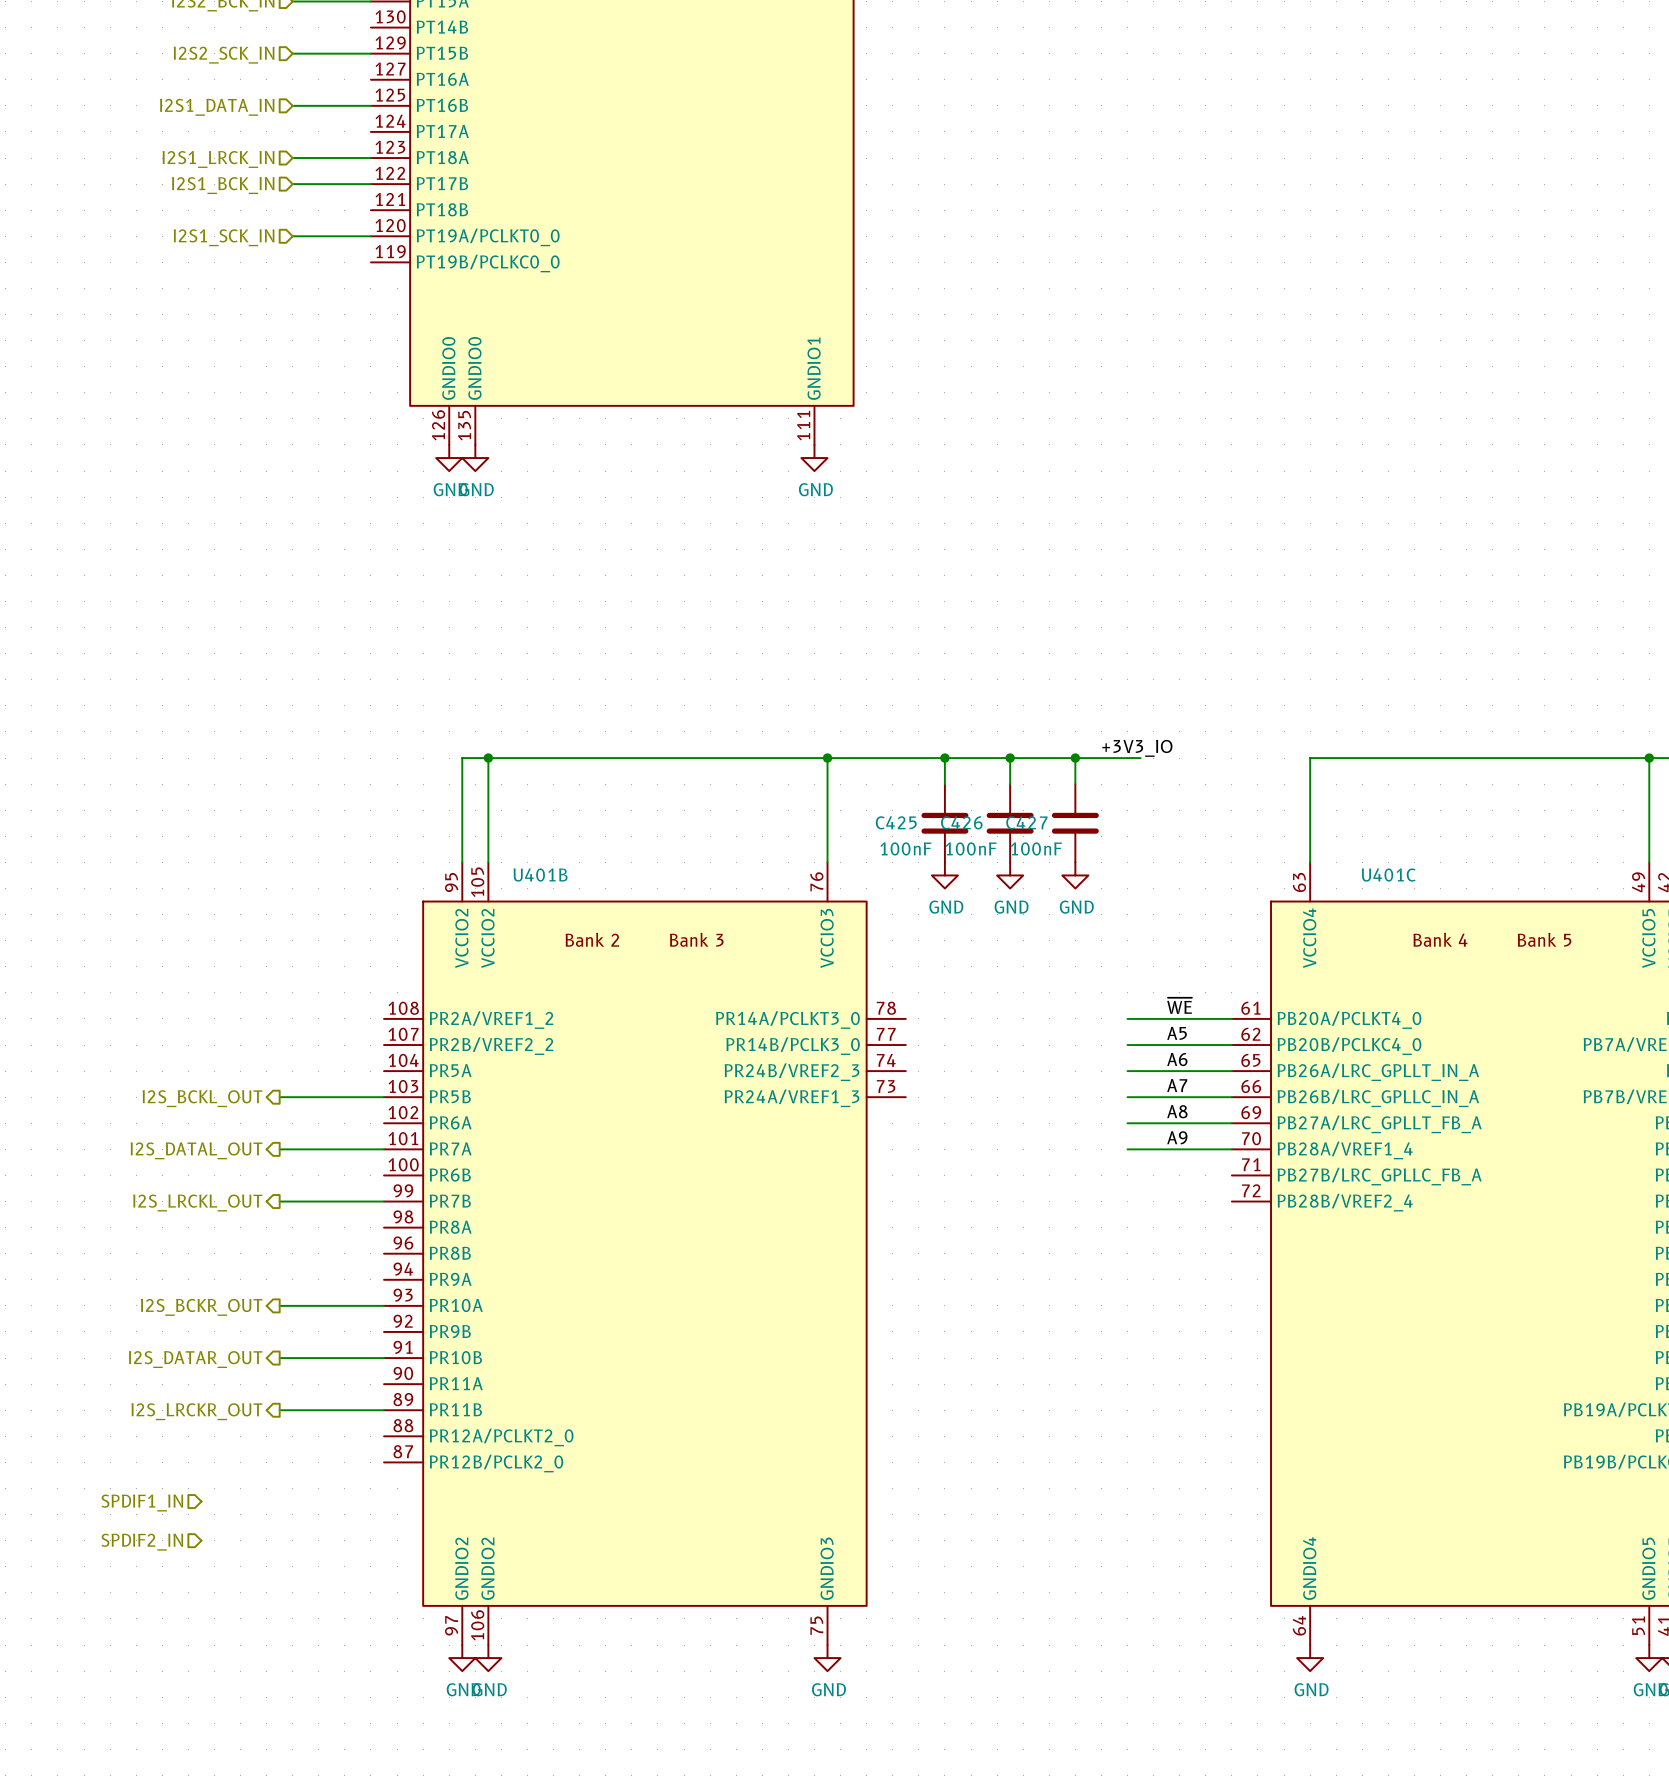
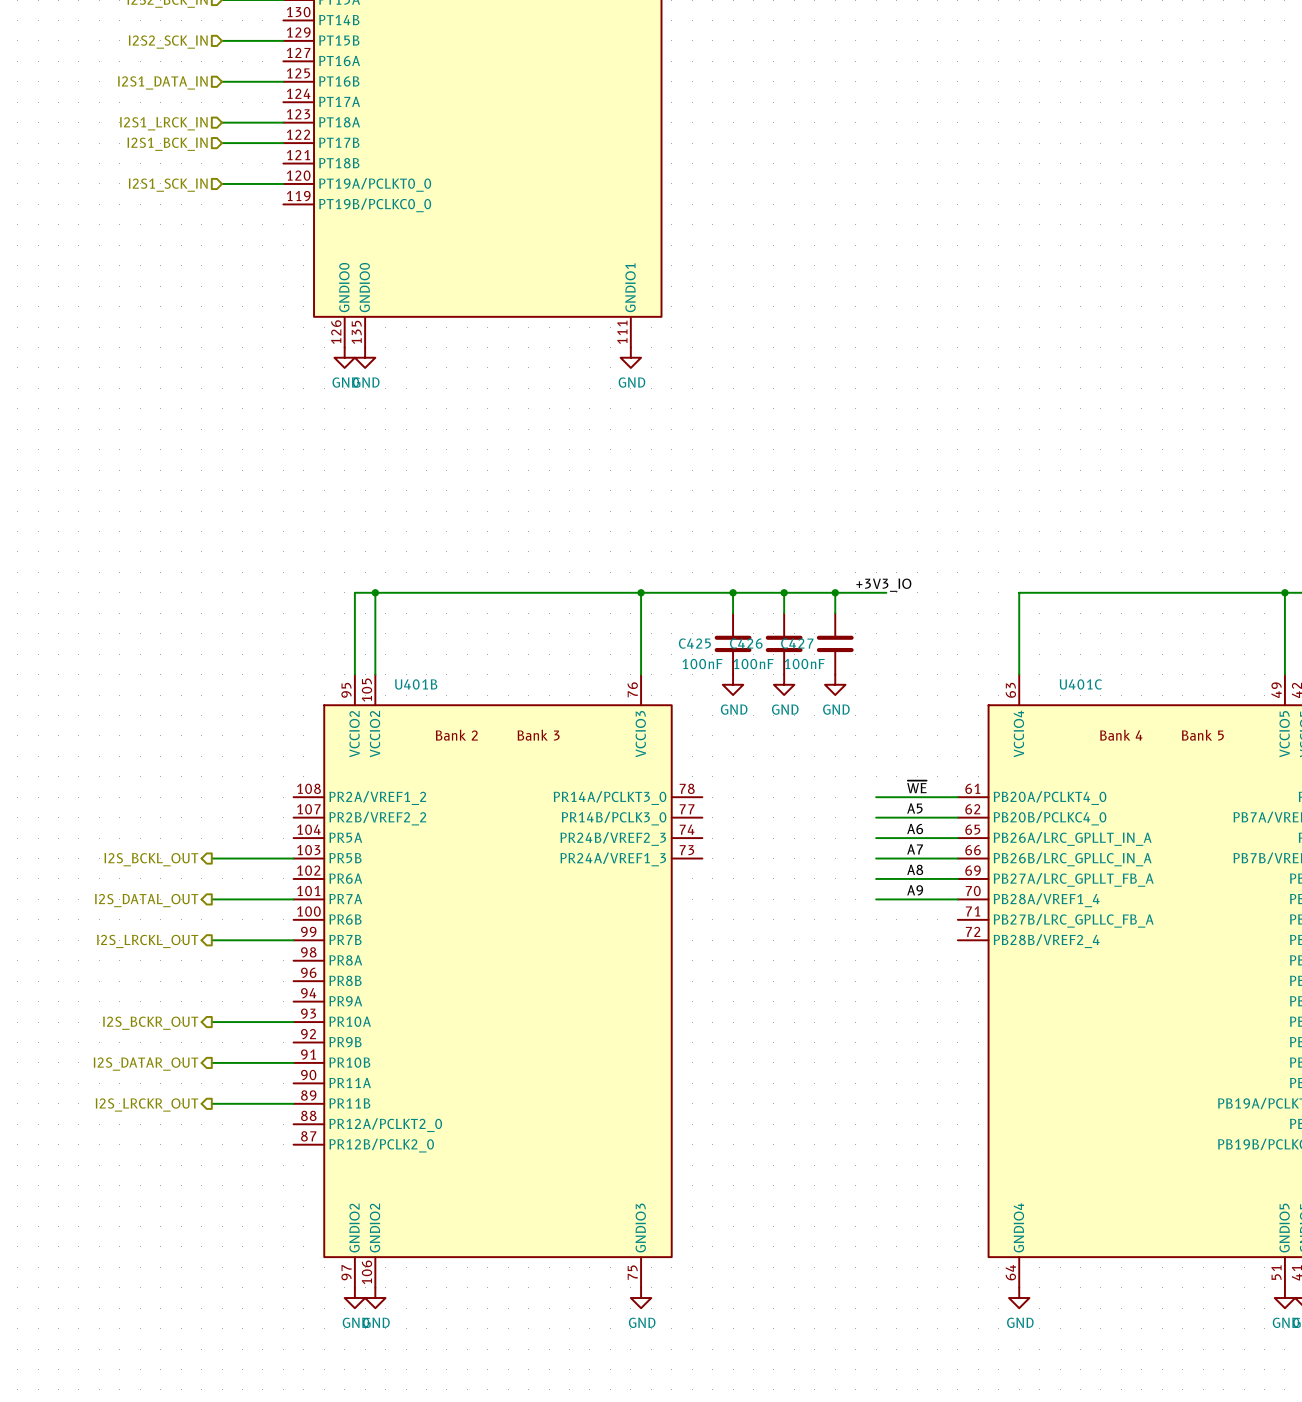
hierarchical label: SPDIF1_IN (142, 1503) -> none
hierarchical label: SPDIF2_IN (142, 1542) -> none

